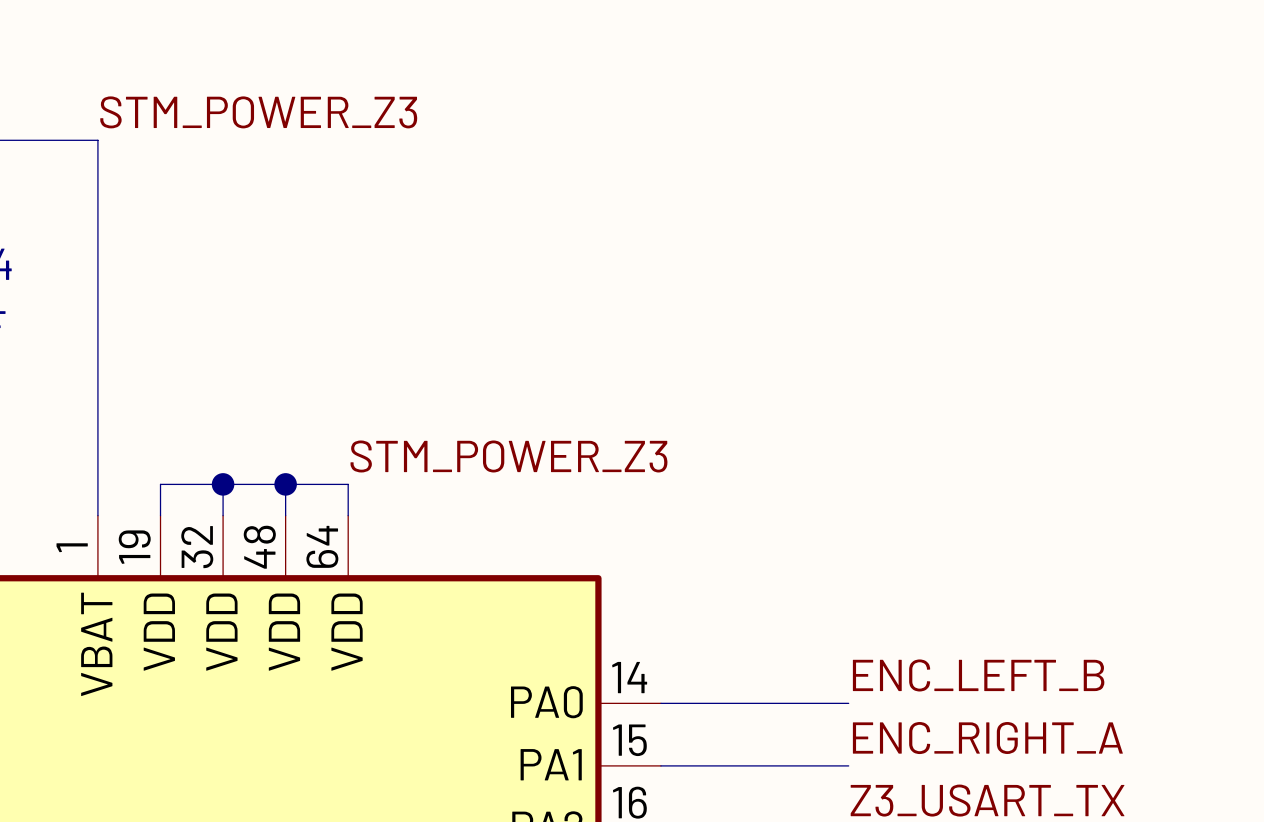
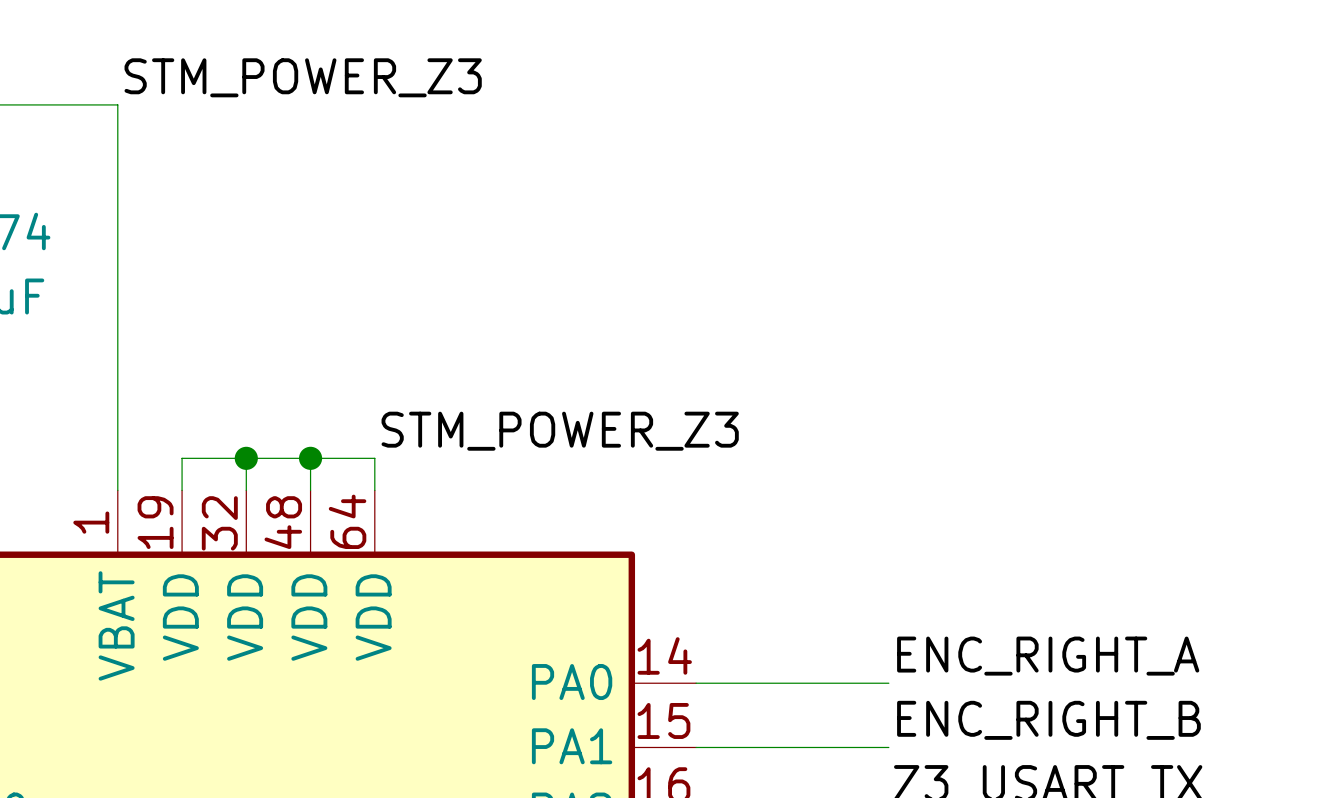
label: ENC_LEFT_B (978, 675) -> ENC_RIGHT_A (1048, 656)
label: ENC_RIGHT_A (987, 738) -> ENC_RIGHT_B (1048, 720)

